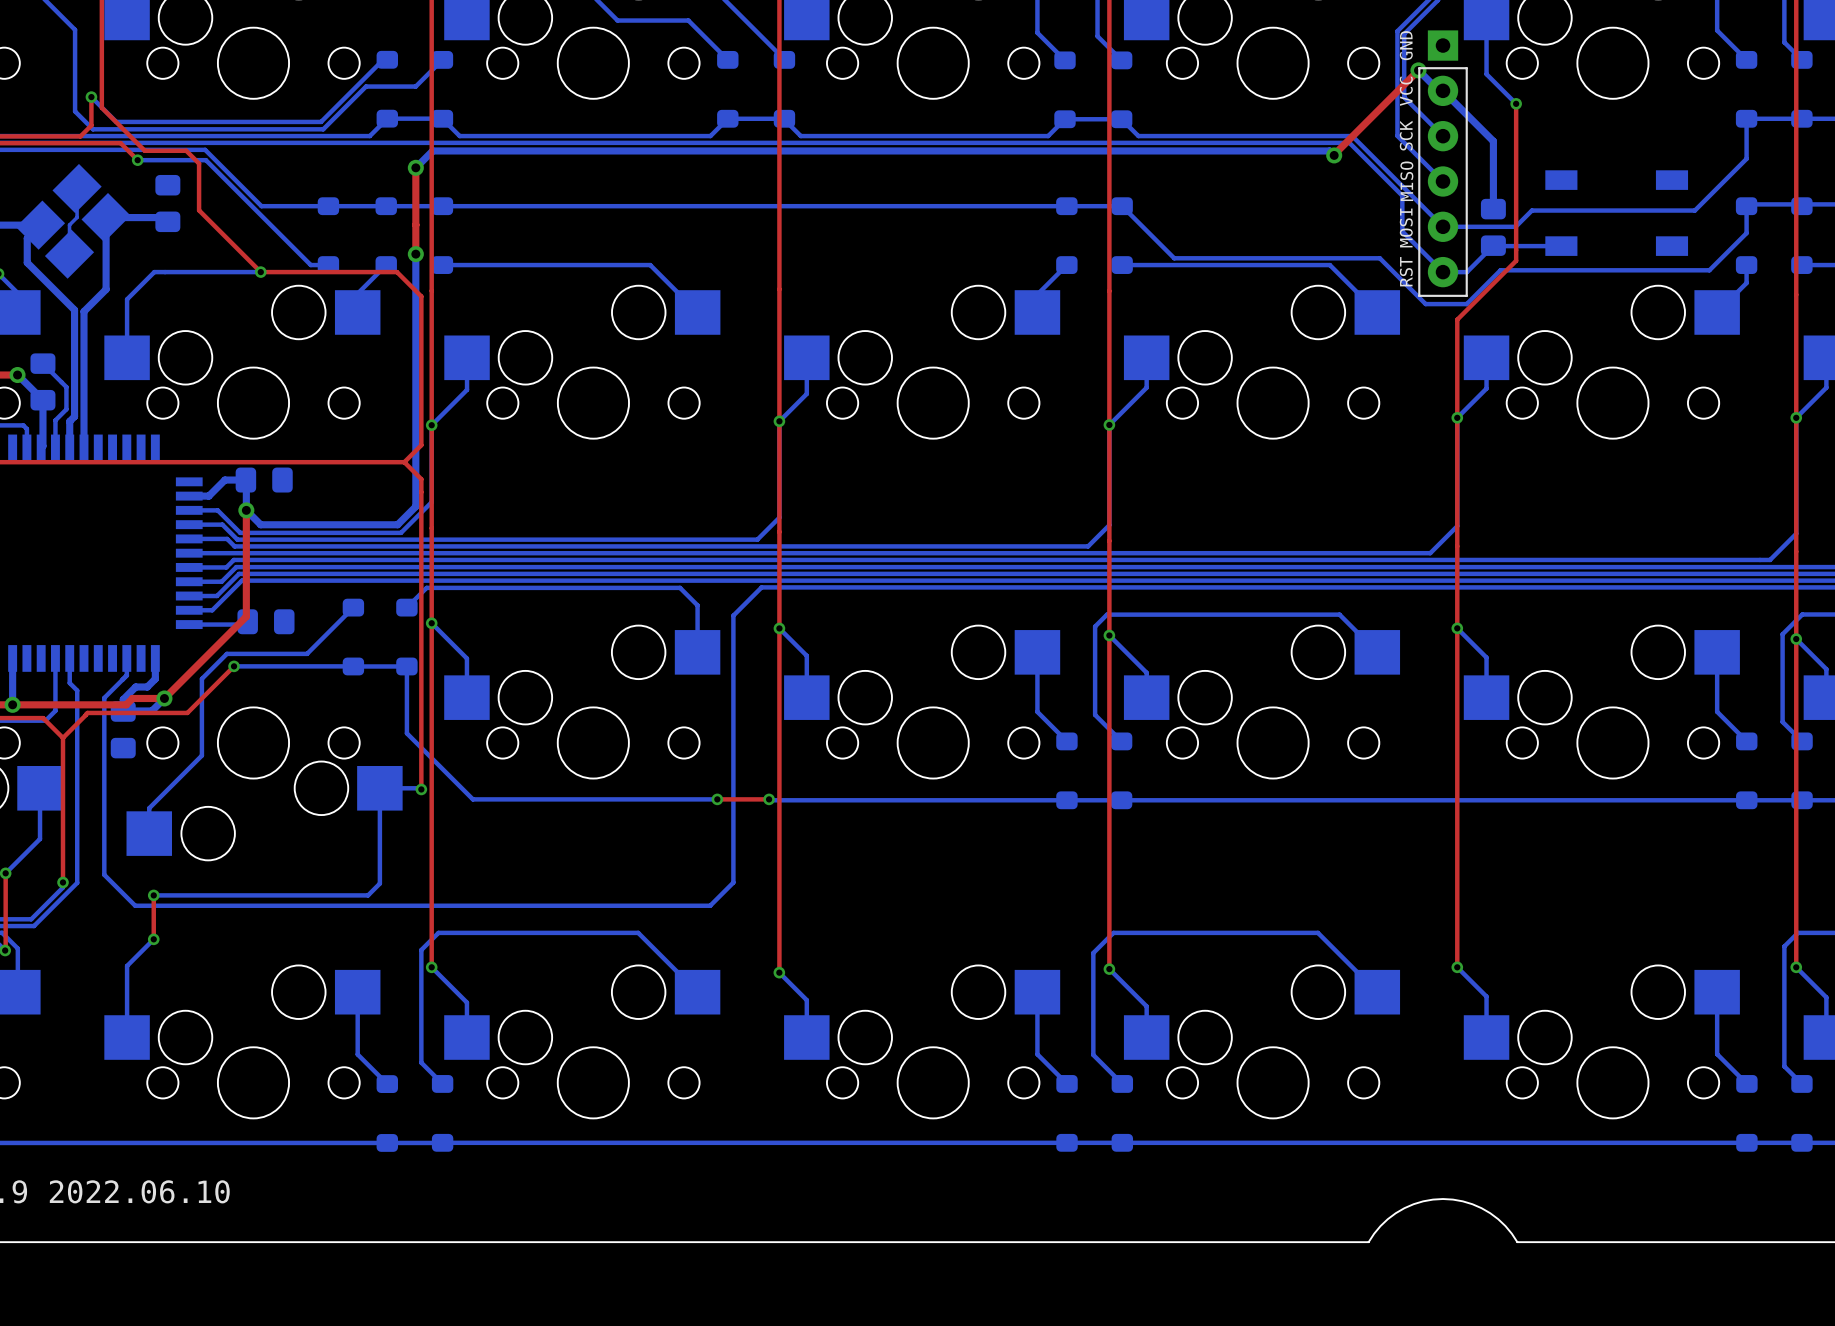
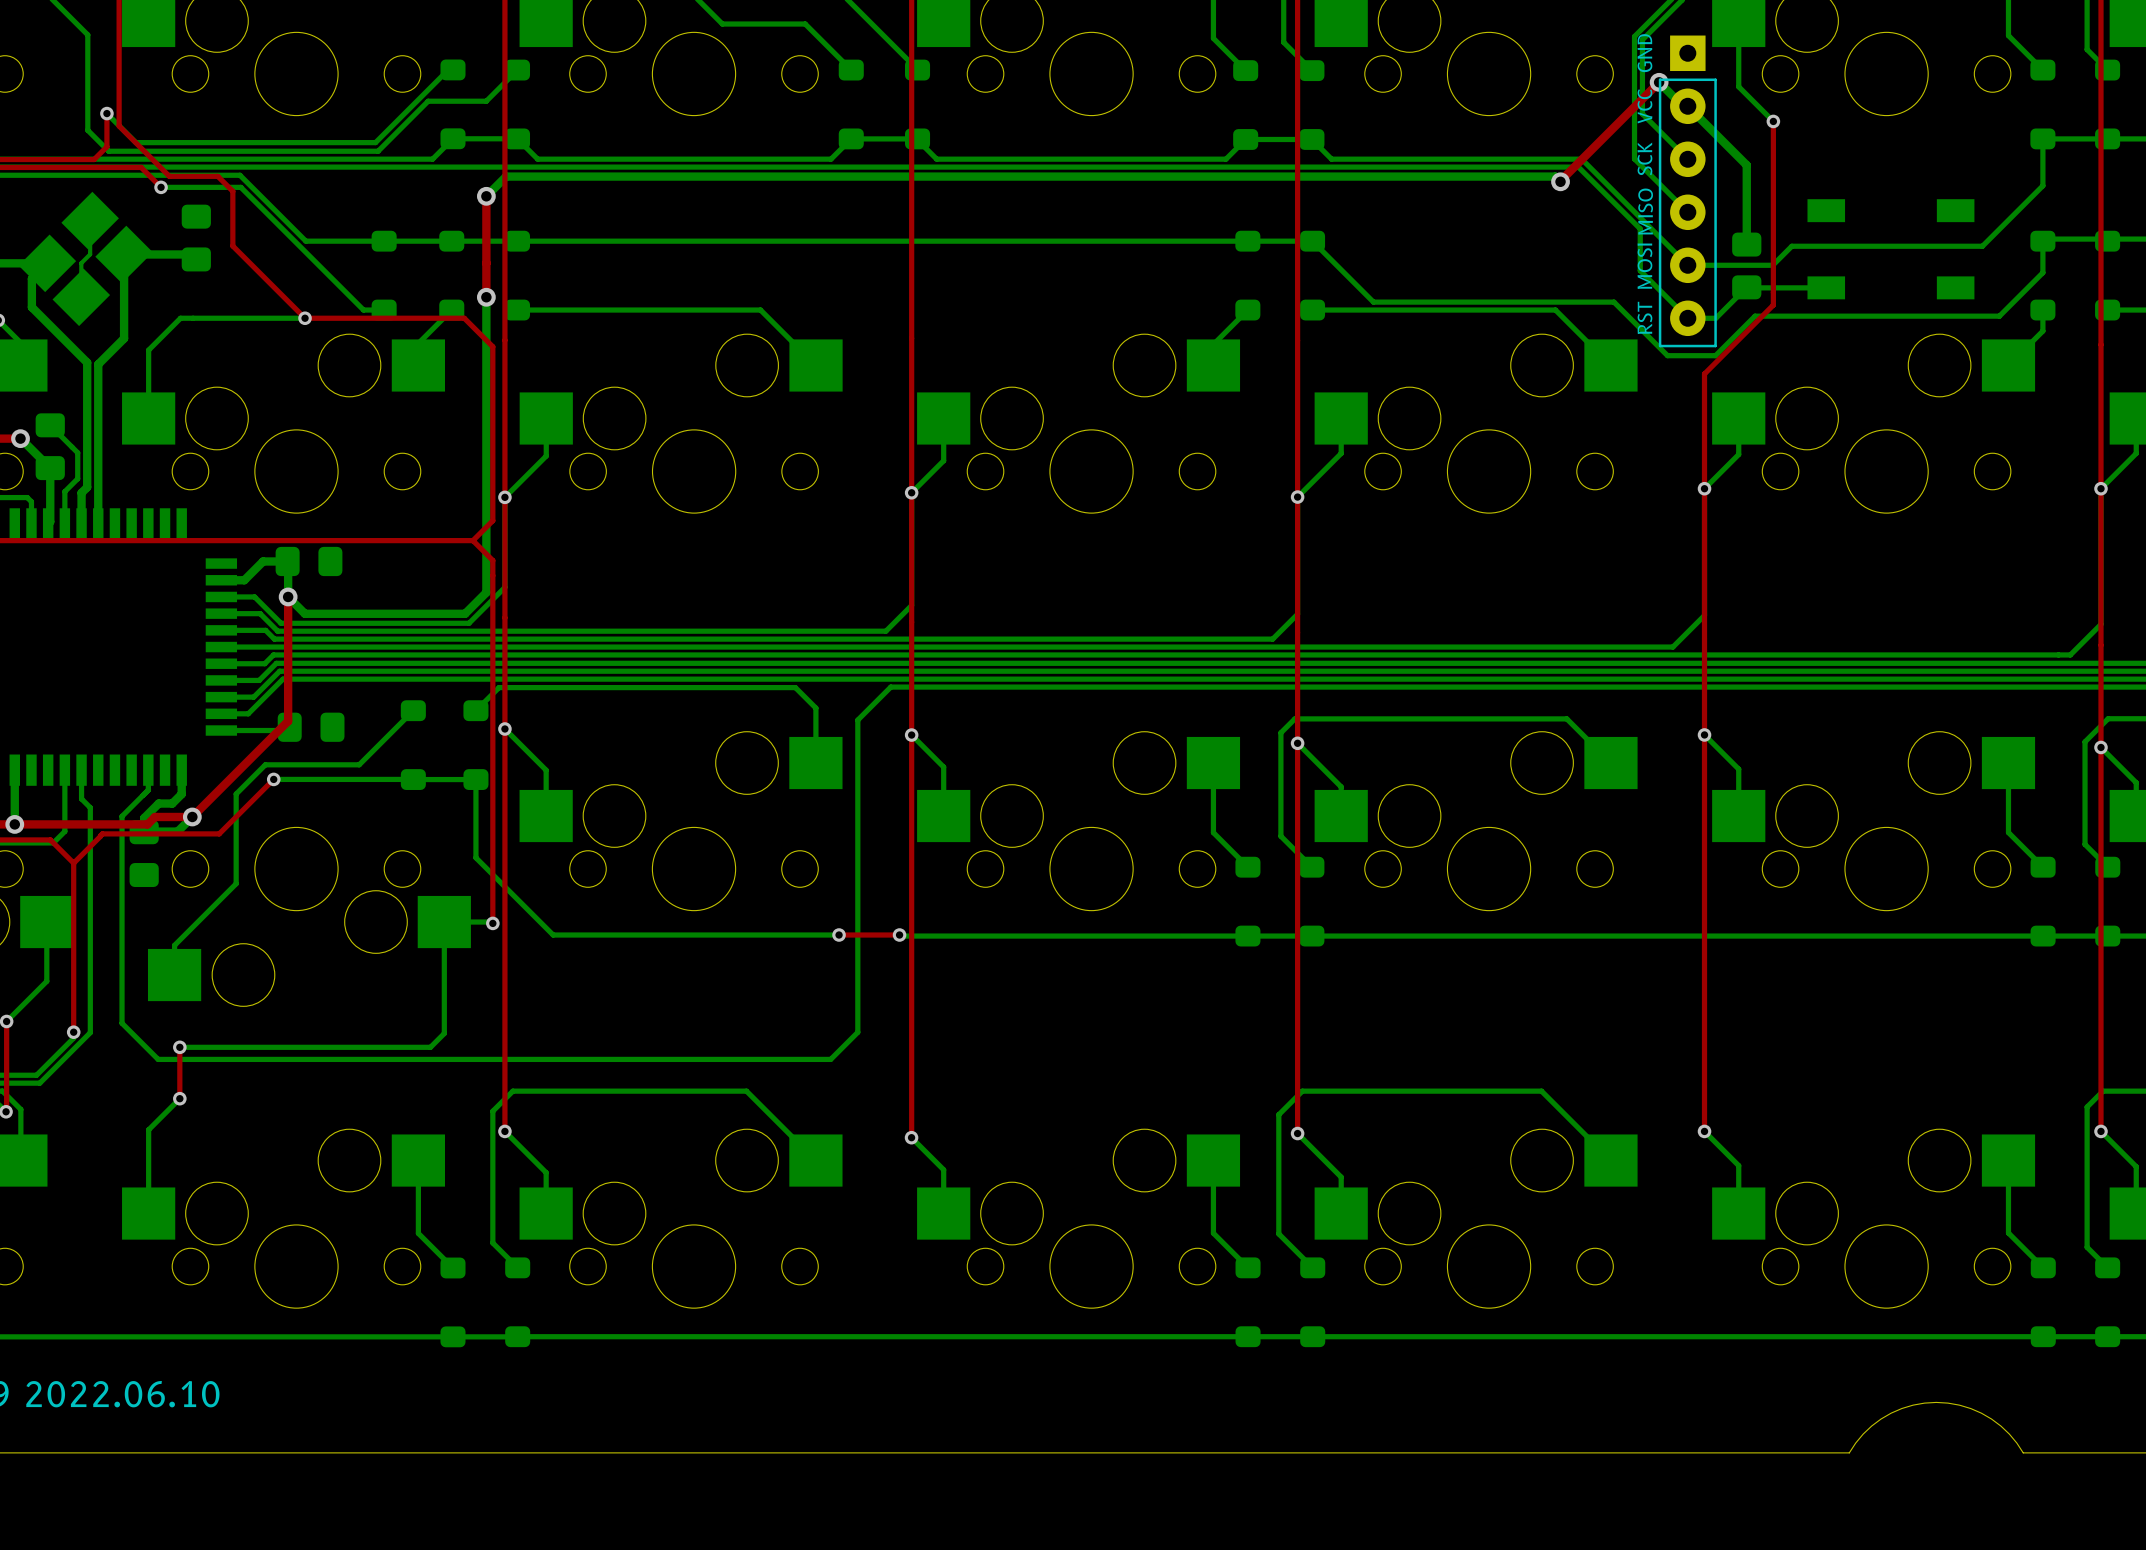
board edge: (1368, 1242) (1380, 1226) (1395, 1213) (1413, 1204) (1443, 1199) (1472, 1204) (1490, 1213) (1505, 1226) (1517, 1242) -> (1600, 1452) (1774, 1452)
board edge: (1581, 1242) (1729, 1242) -> (1849, 1452) (1863, 1434) (1891, 1413) (1913, 1405) (1936, 1402) (1959, 1405) (1991, 1419) (2009, 1434) (2023, 1452)

